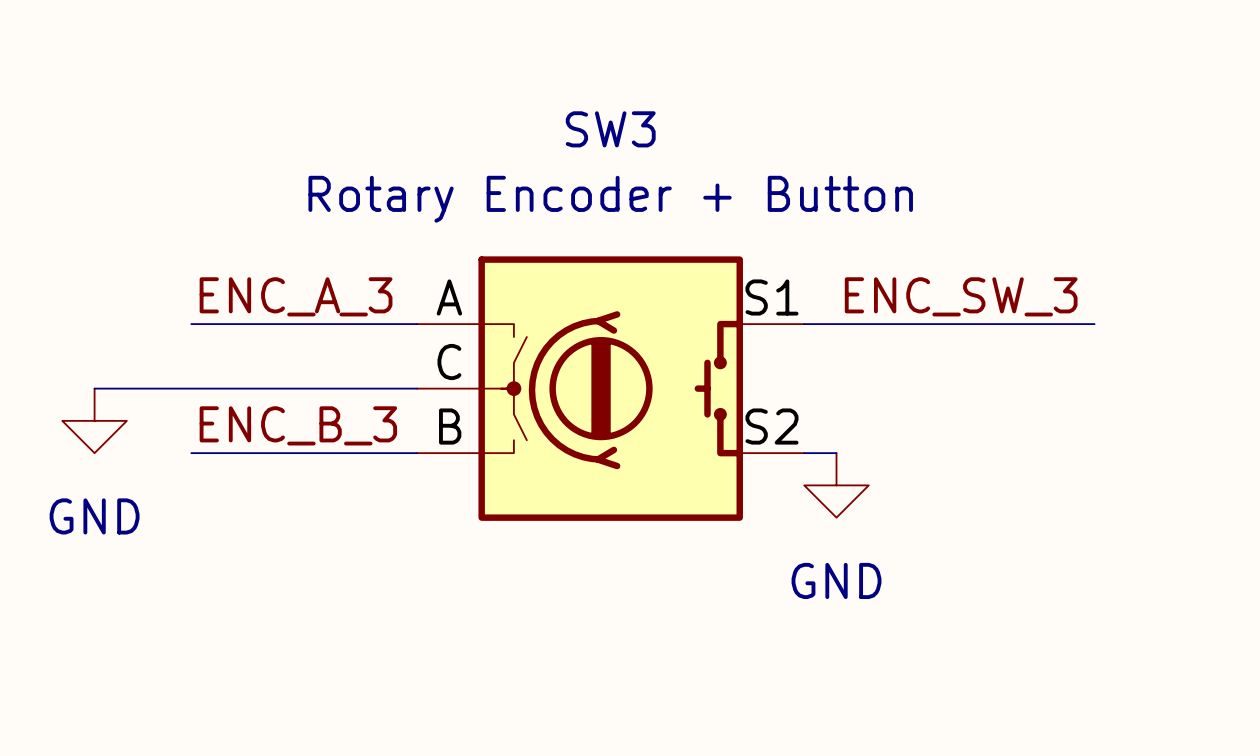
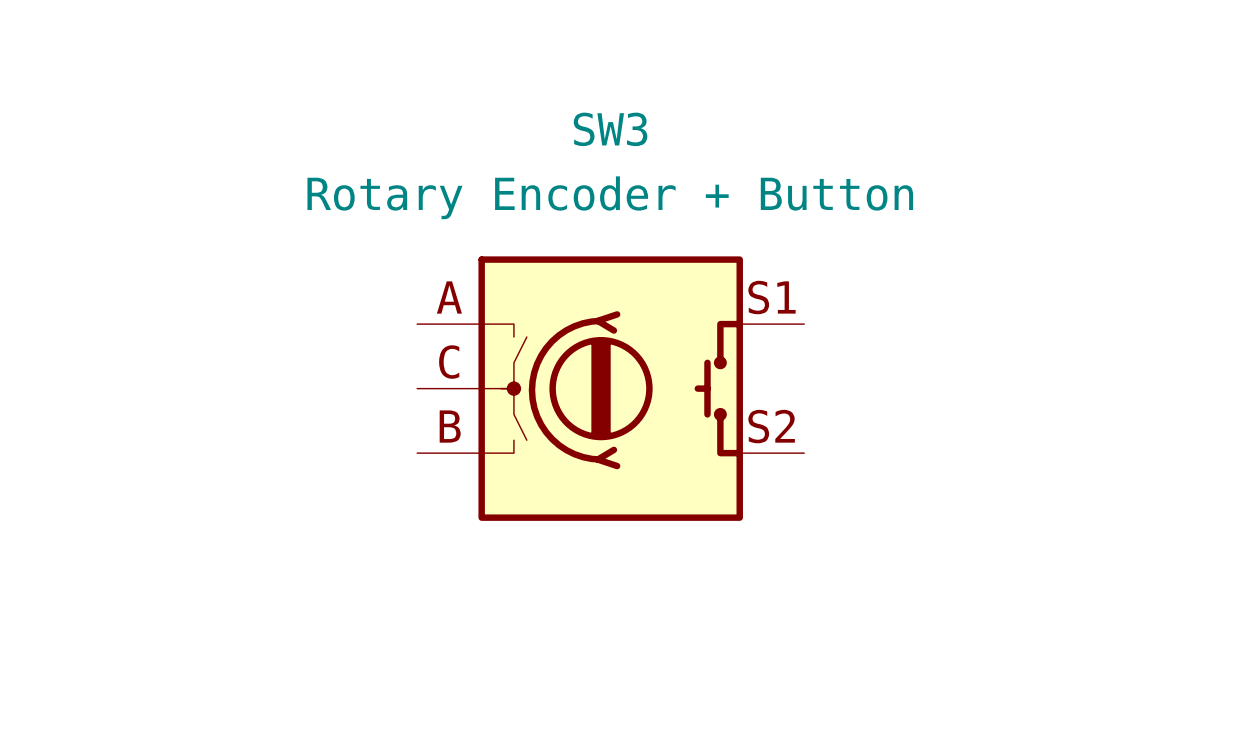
label: ENC_A_3 (296, 296) -> none
label: ENC_SW_3 (961, 296) -> none
wire: (191, 324) (417, 324) -> none
wire: (804, 324) (1094, 324) -> none
wire: (94, 388) (417, 388) -> none
power symbol: GND (94, 420) -> none
label: ENC_B_3 (298, 425) -> none
wire: (191, 453) (417, 453) -> none
wire: (804, 453) (836, 453) -> none
power symbol: GND (836, 485) -> none

